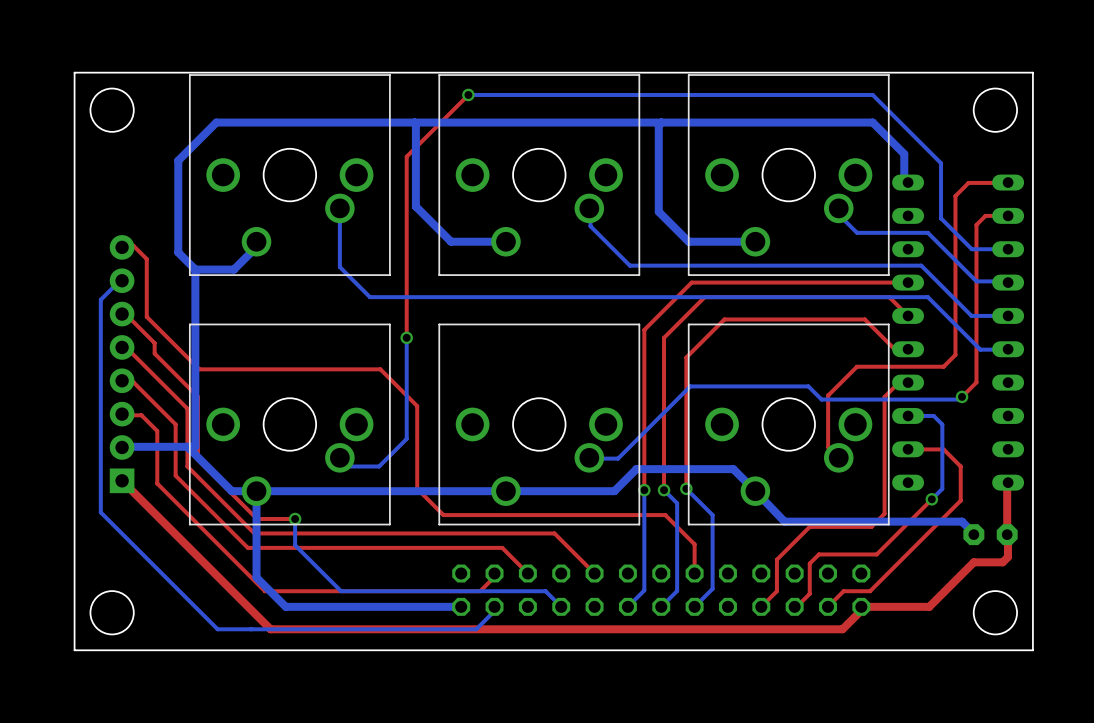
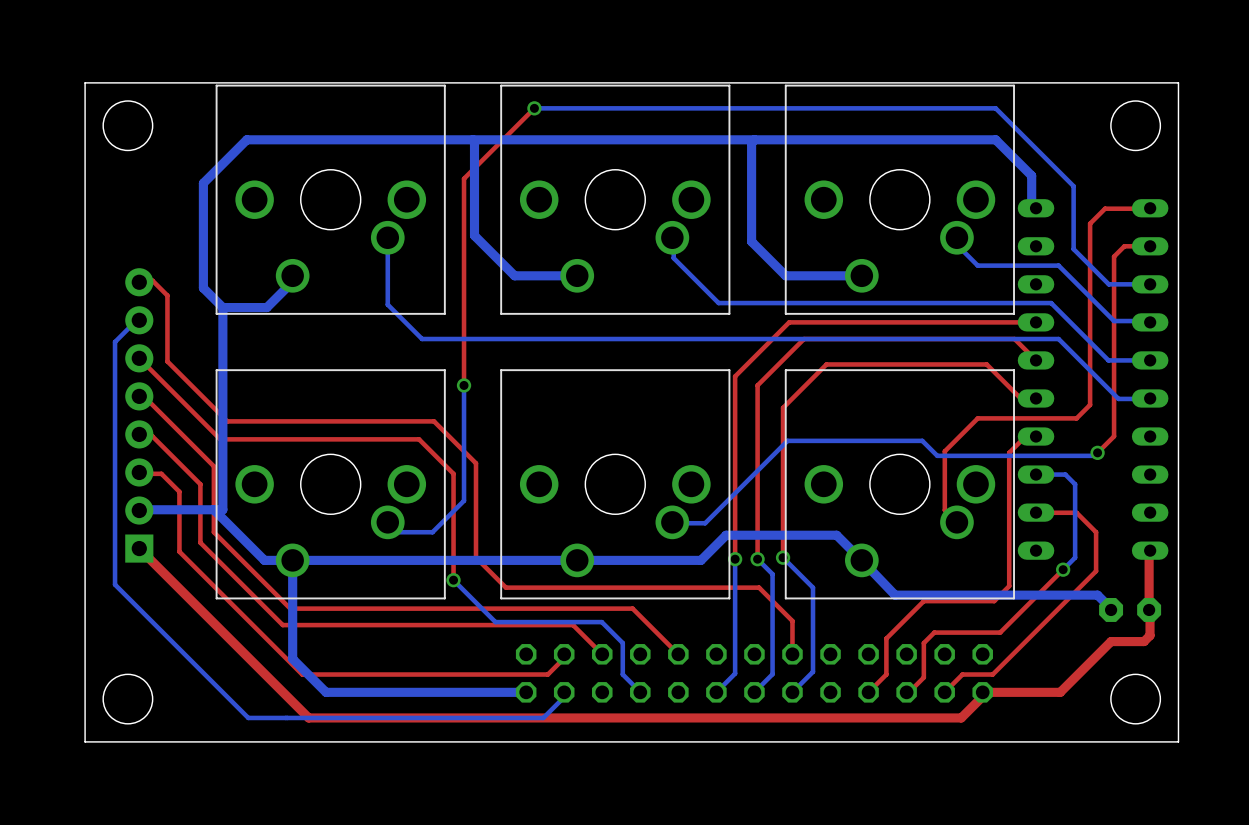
top track: (122, 314) (125, 314) (154, 343) (154, 353) (197, 396) (197, 459) (257, 519) (295, 519) -> (139, 358) (220, 439) (419, 439) (453, 473) (453, 580)
via: none -> (453, 580)
bottom track: (295, 519) (295, 545) (341, 591) (545, 591) (561, 606) -> (453, 580) (495, 622) (601, 622) (622, 643) (622, 674) (640, 692)
via: (295, 519) -> none

